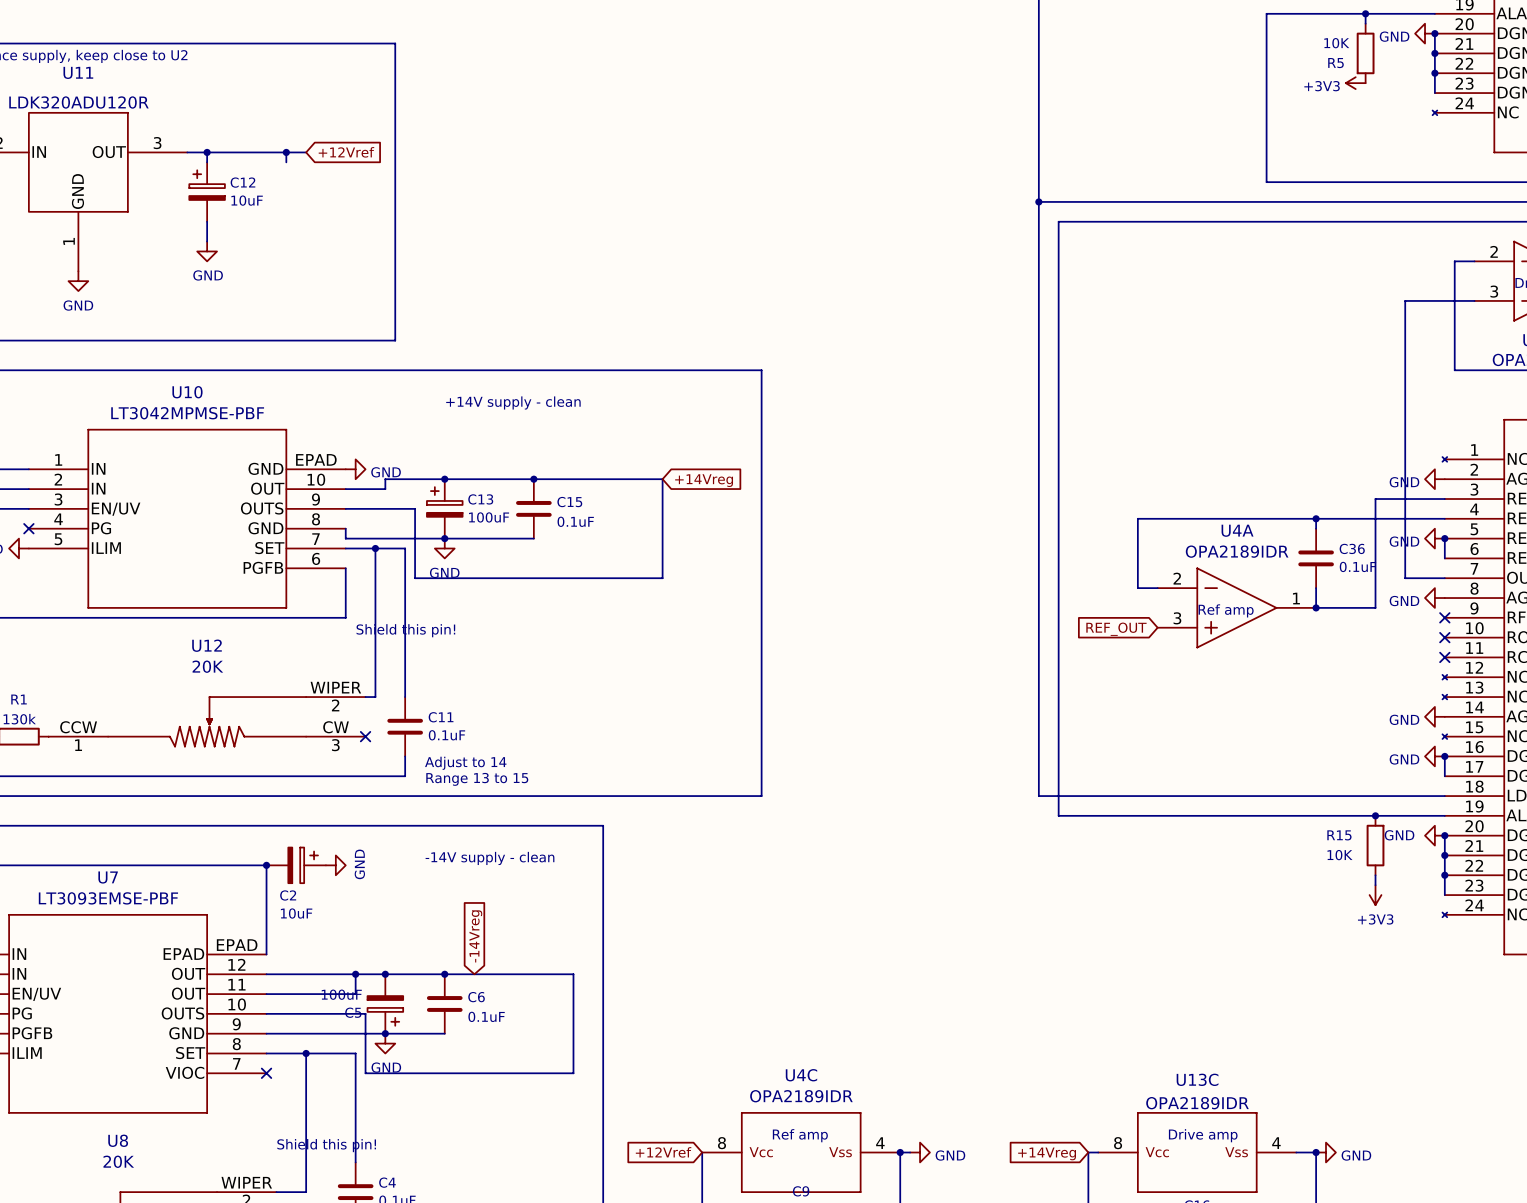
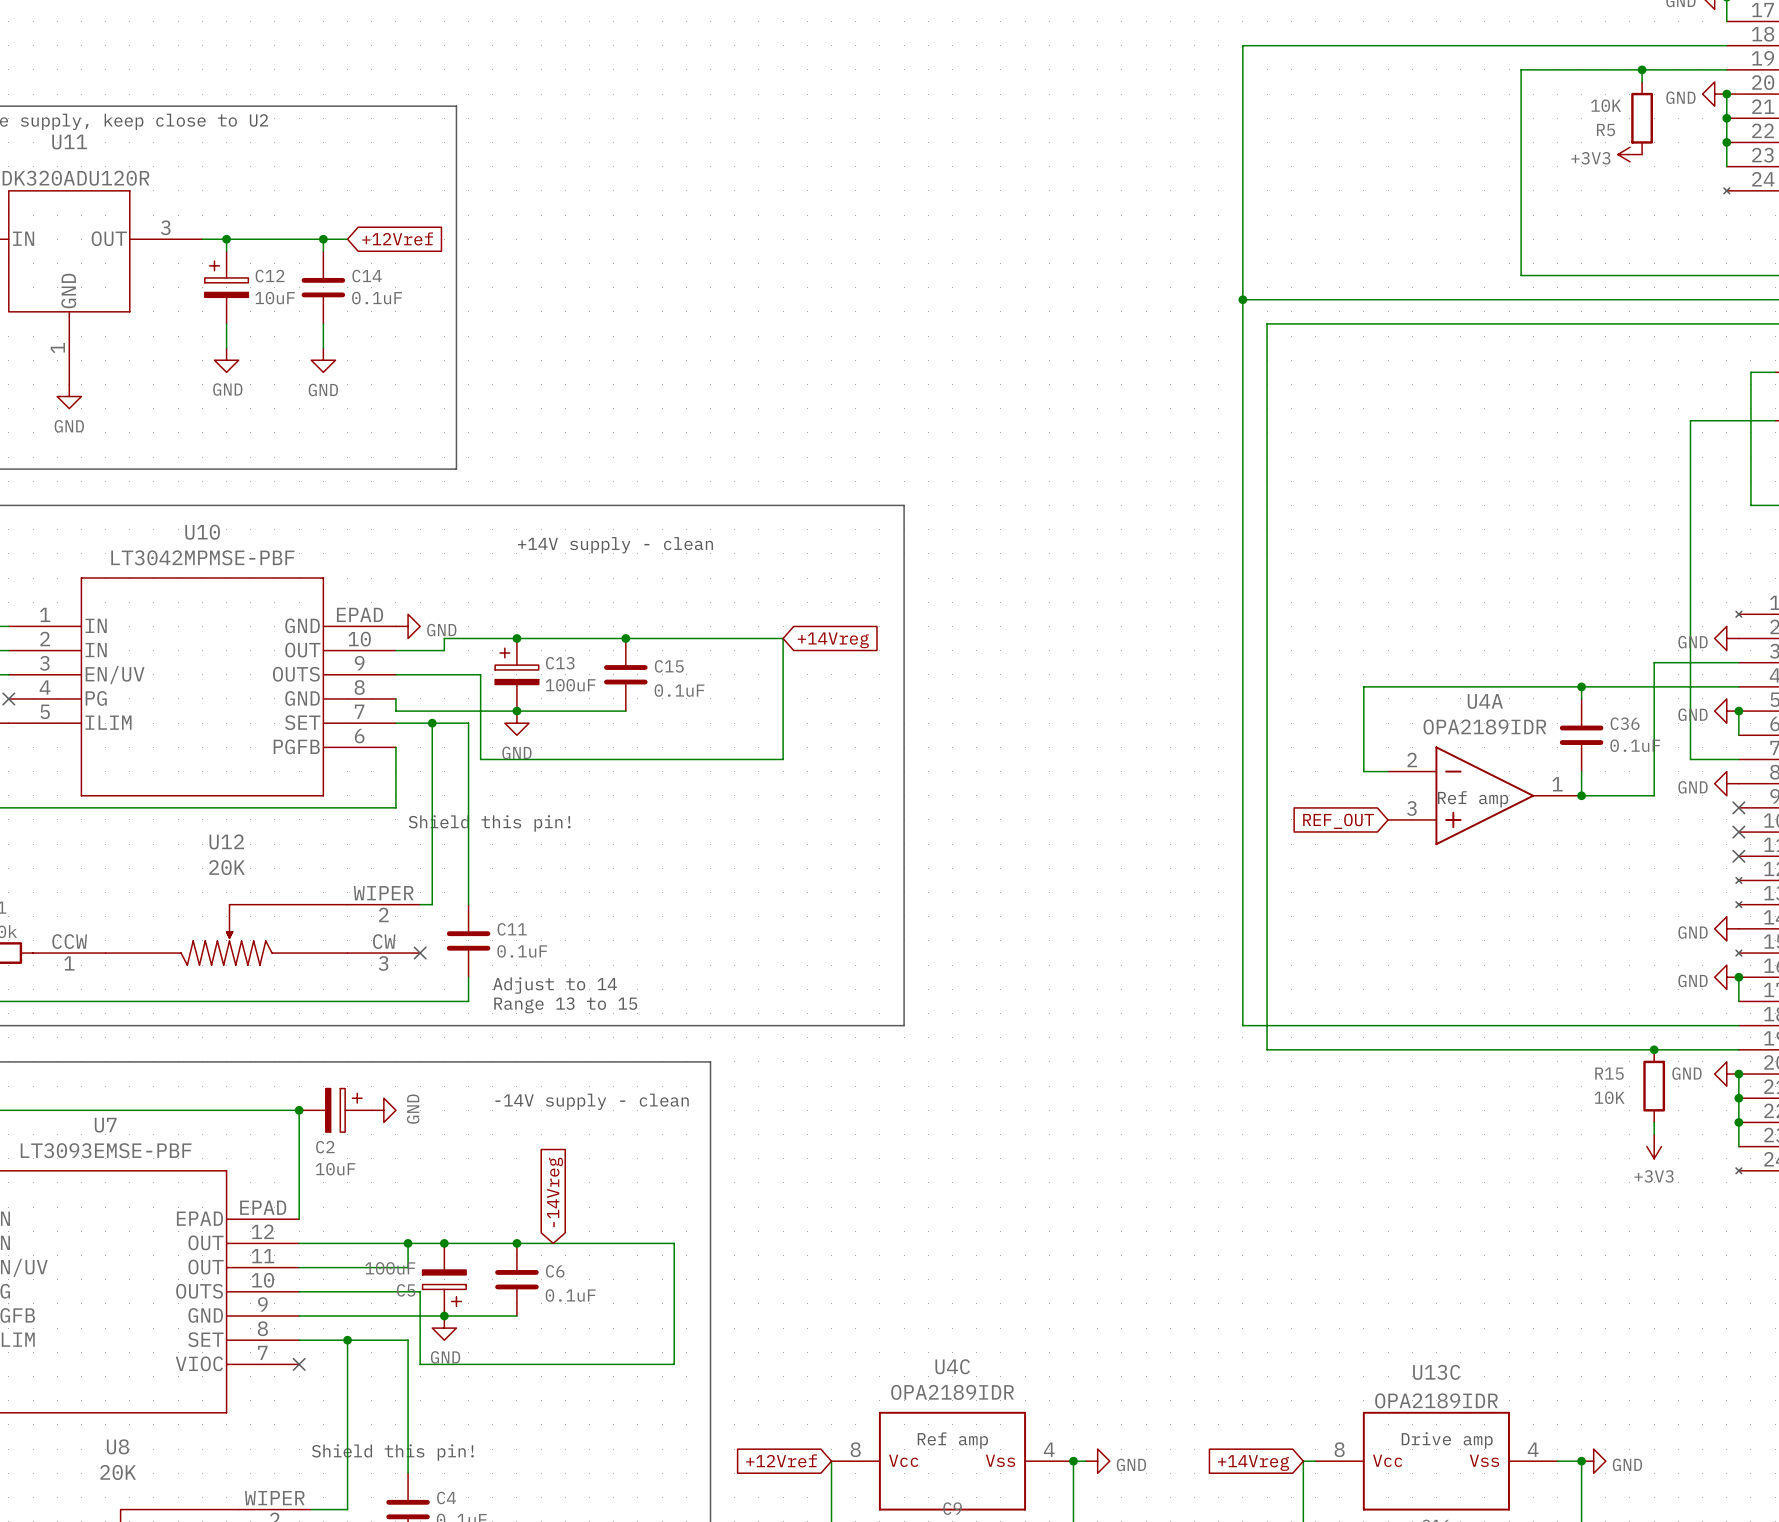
C14: none -> 0.1uF (323, 287)
wire: none -> (323, 323) (323, 348)
power symbol: none -> GND (323, 360)

